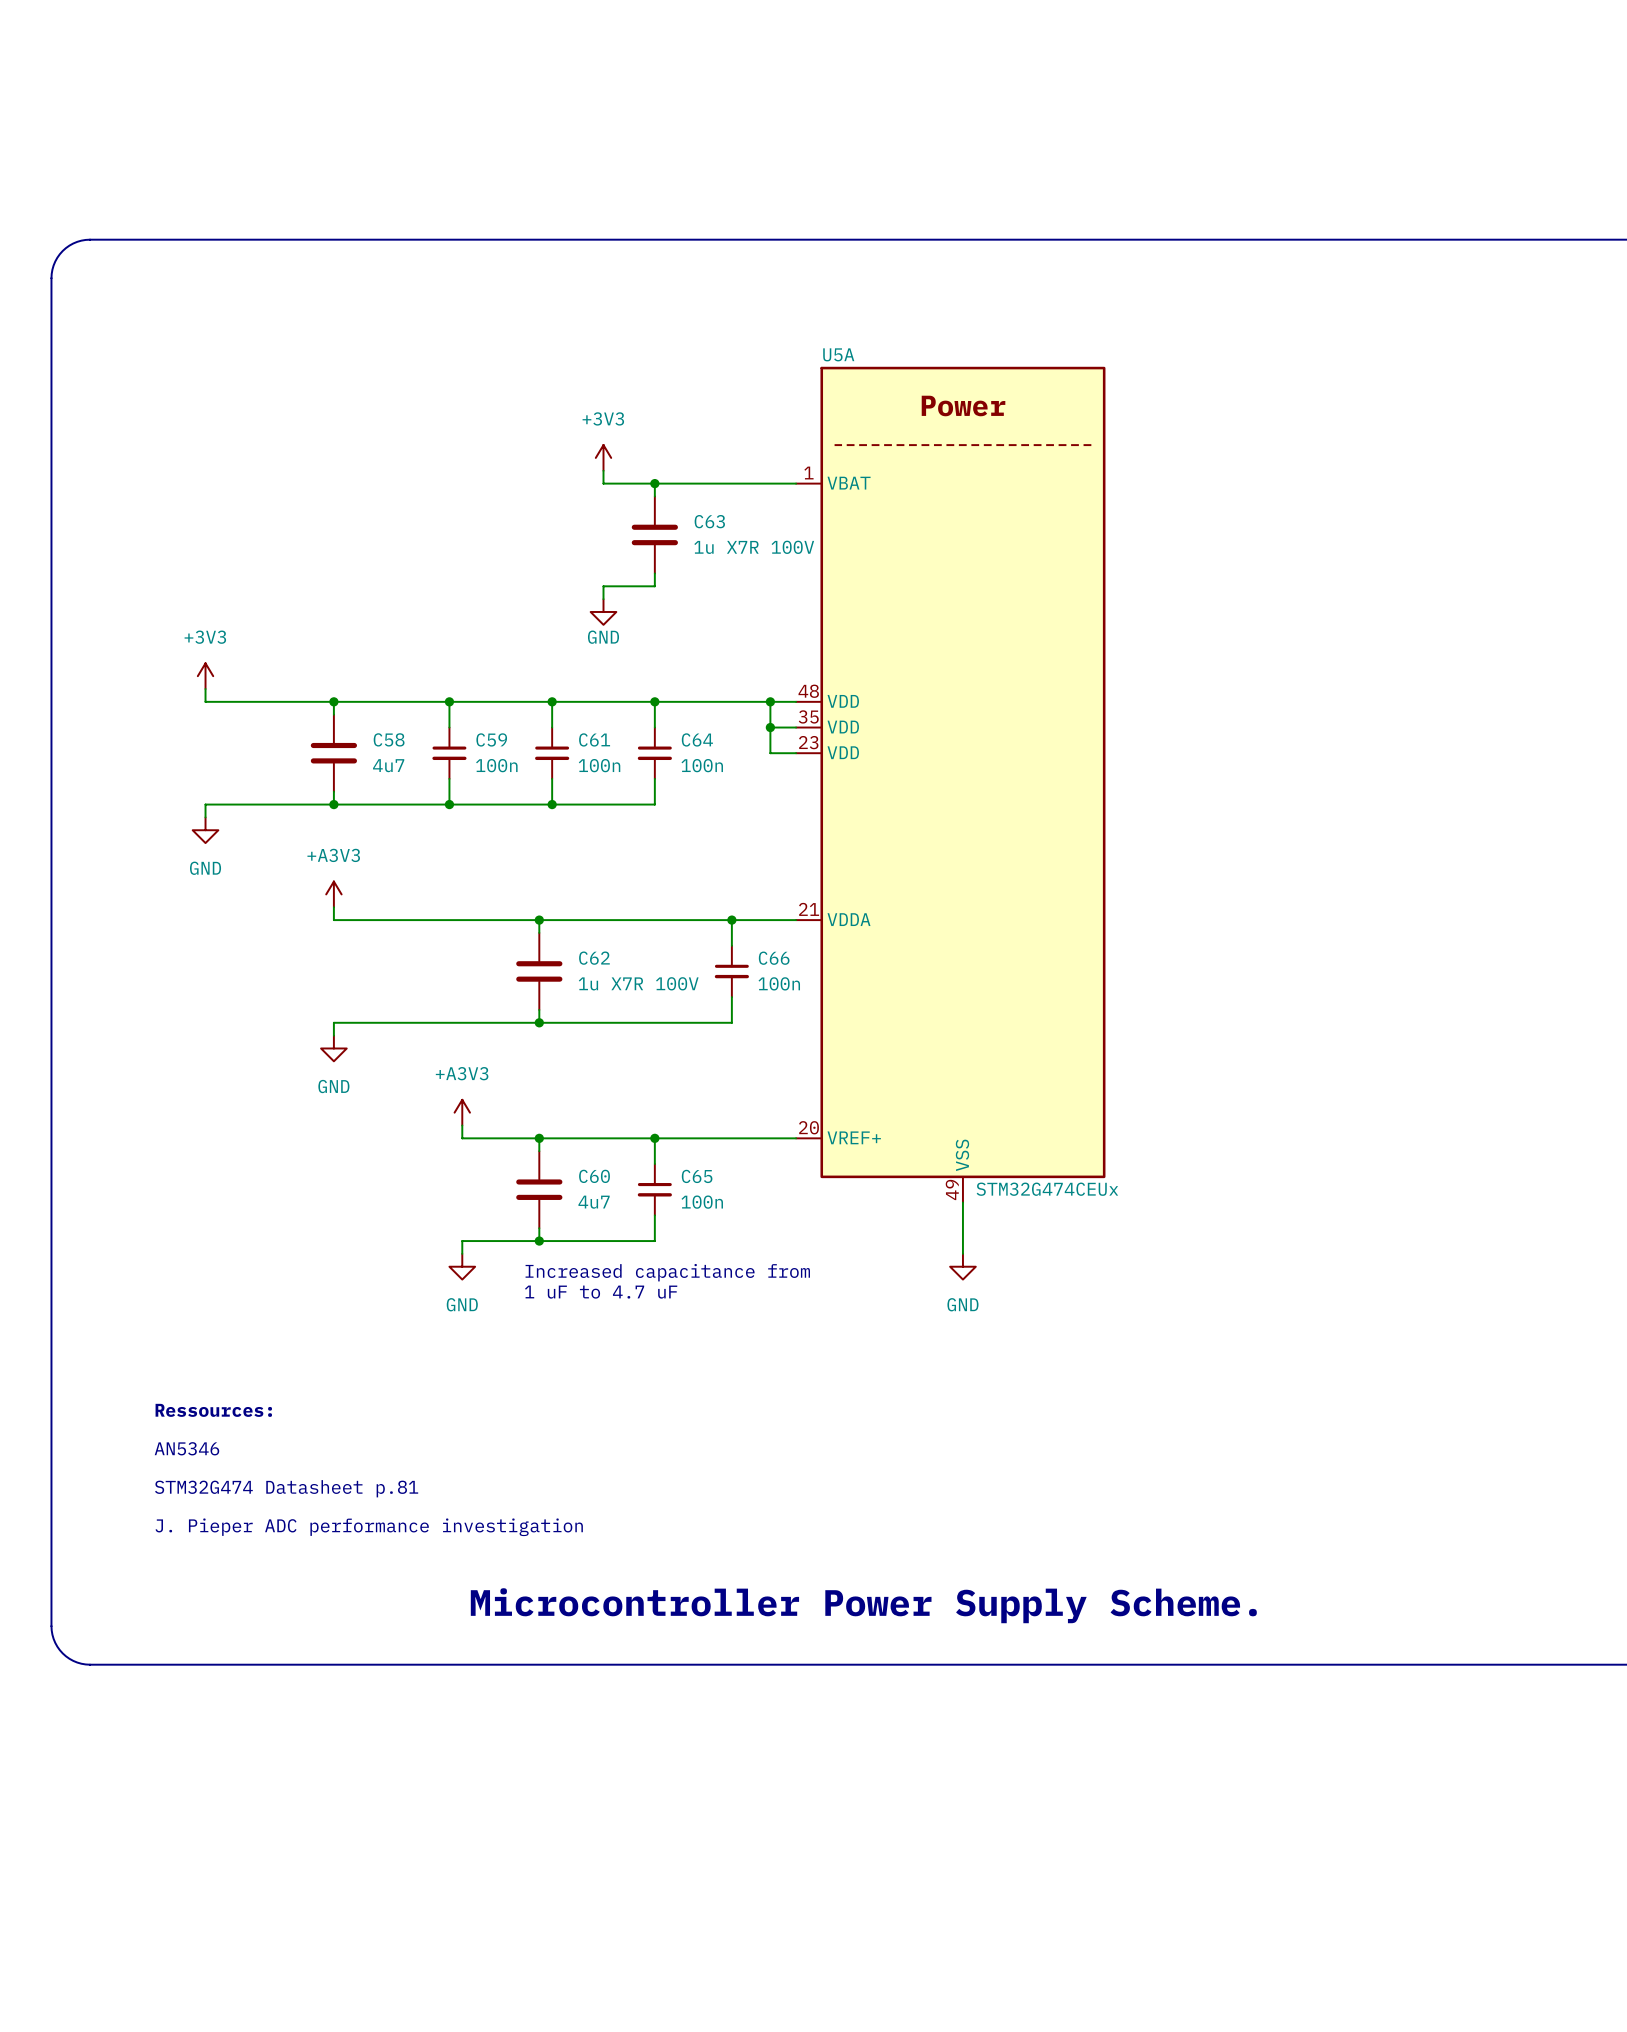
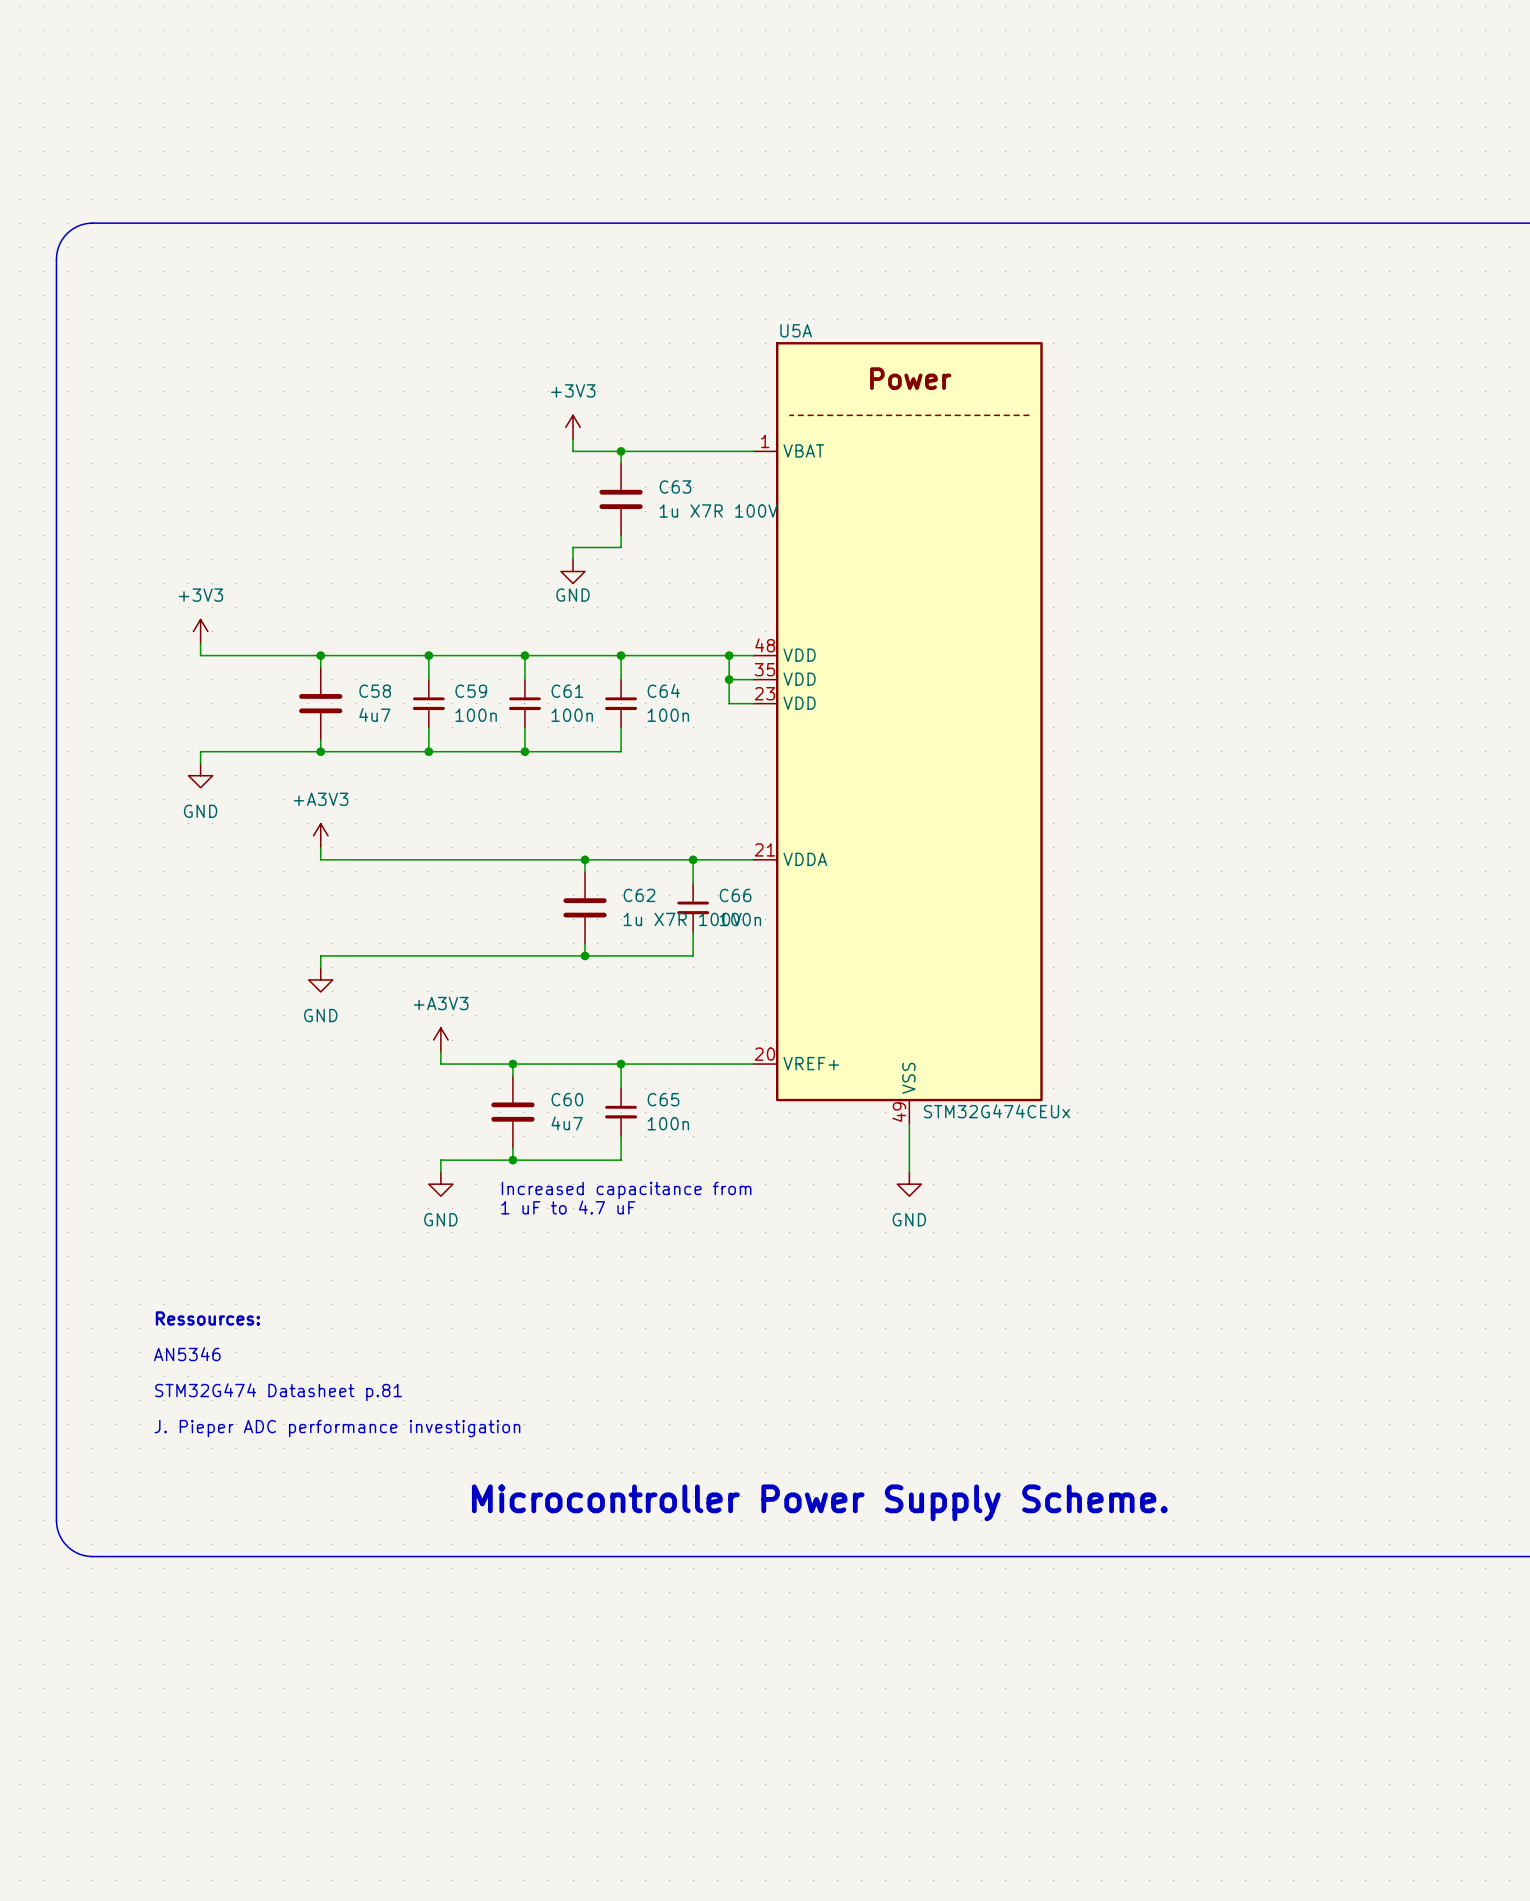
wire: (539, 920) (539, 932) -> (585, 859) (585, 871)
junction: (539, 920) -> none
junction: none -> (585, 859)
C62 position: (539, 971) -> (585, 907)
wire: (539, 1009) (539, 1022) -> (585, 943) (585, 955)
junction: (539, 1022) -> none
junction: none -> (585, 955)

